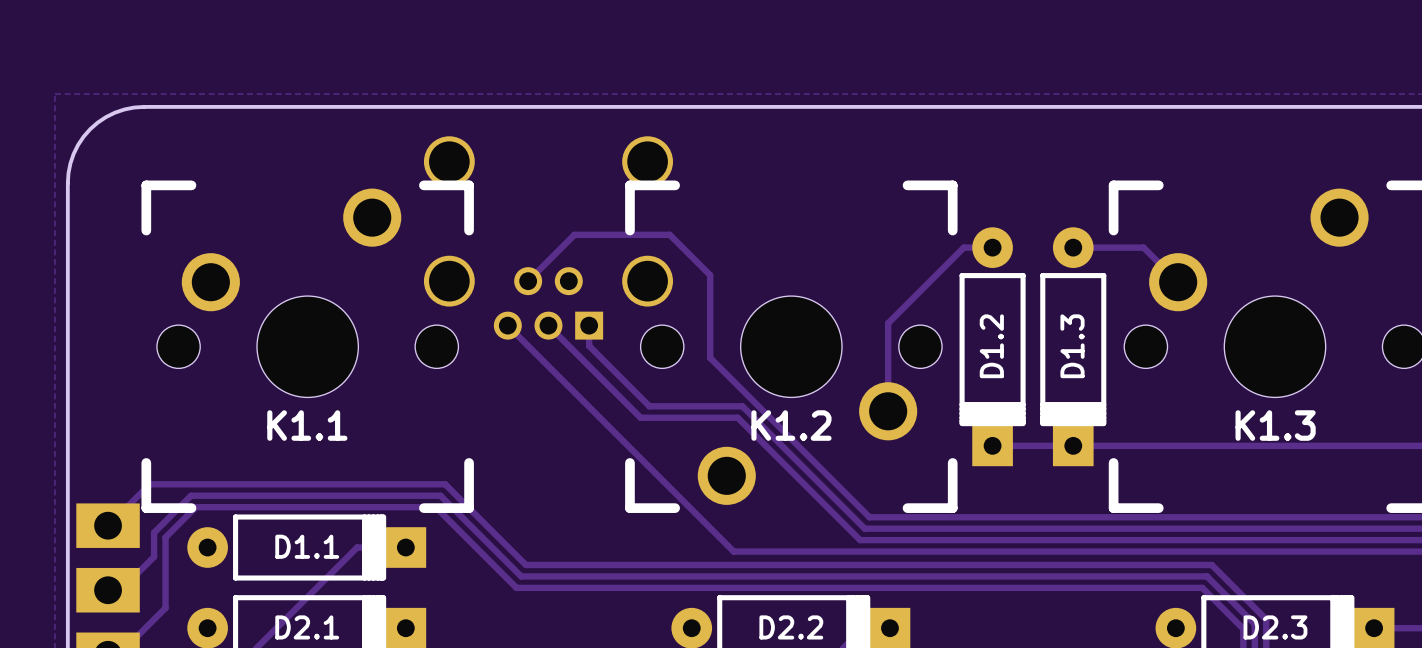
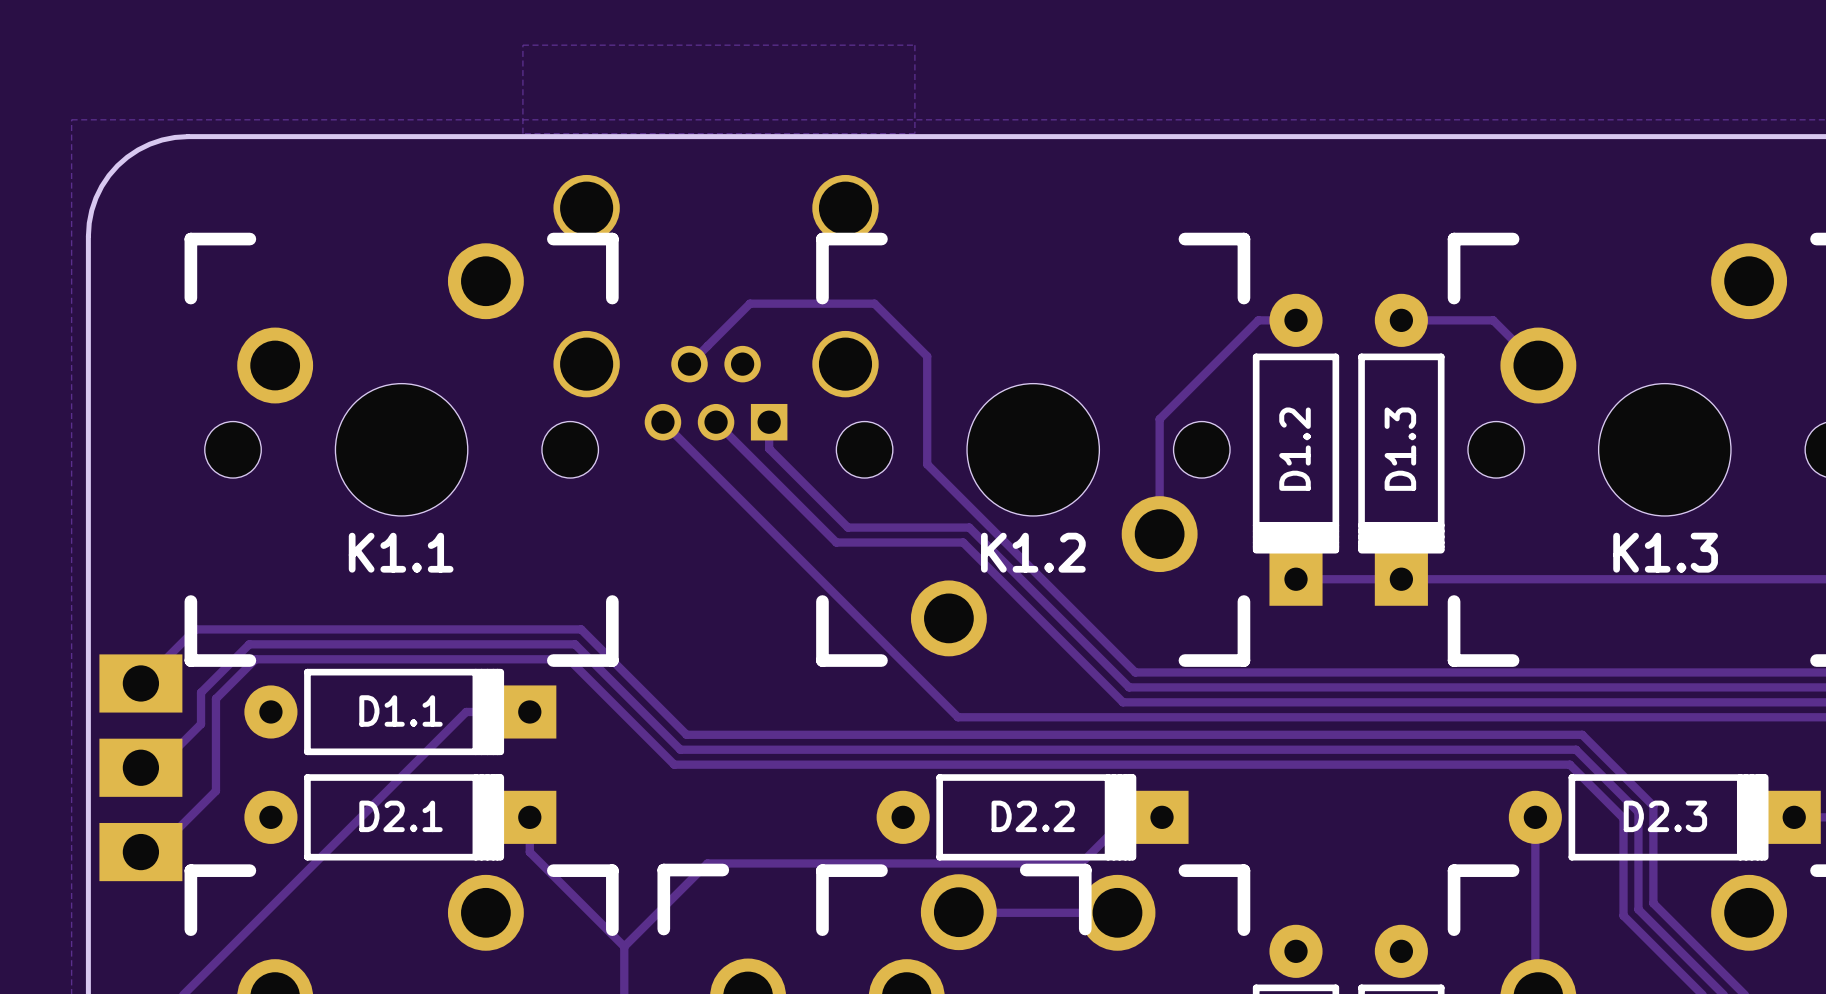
zone outline: none -> (522, 45) (914, 45) (914, 133) (522, 133) (522, 45)

